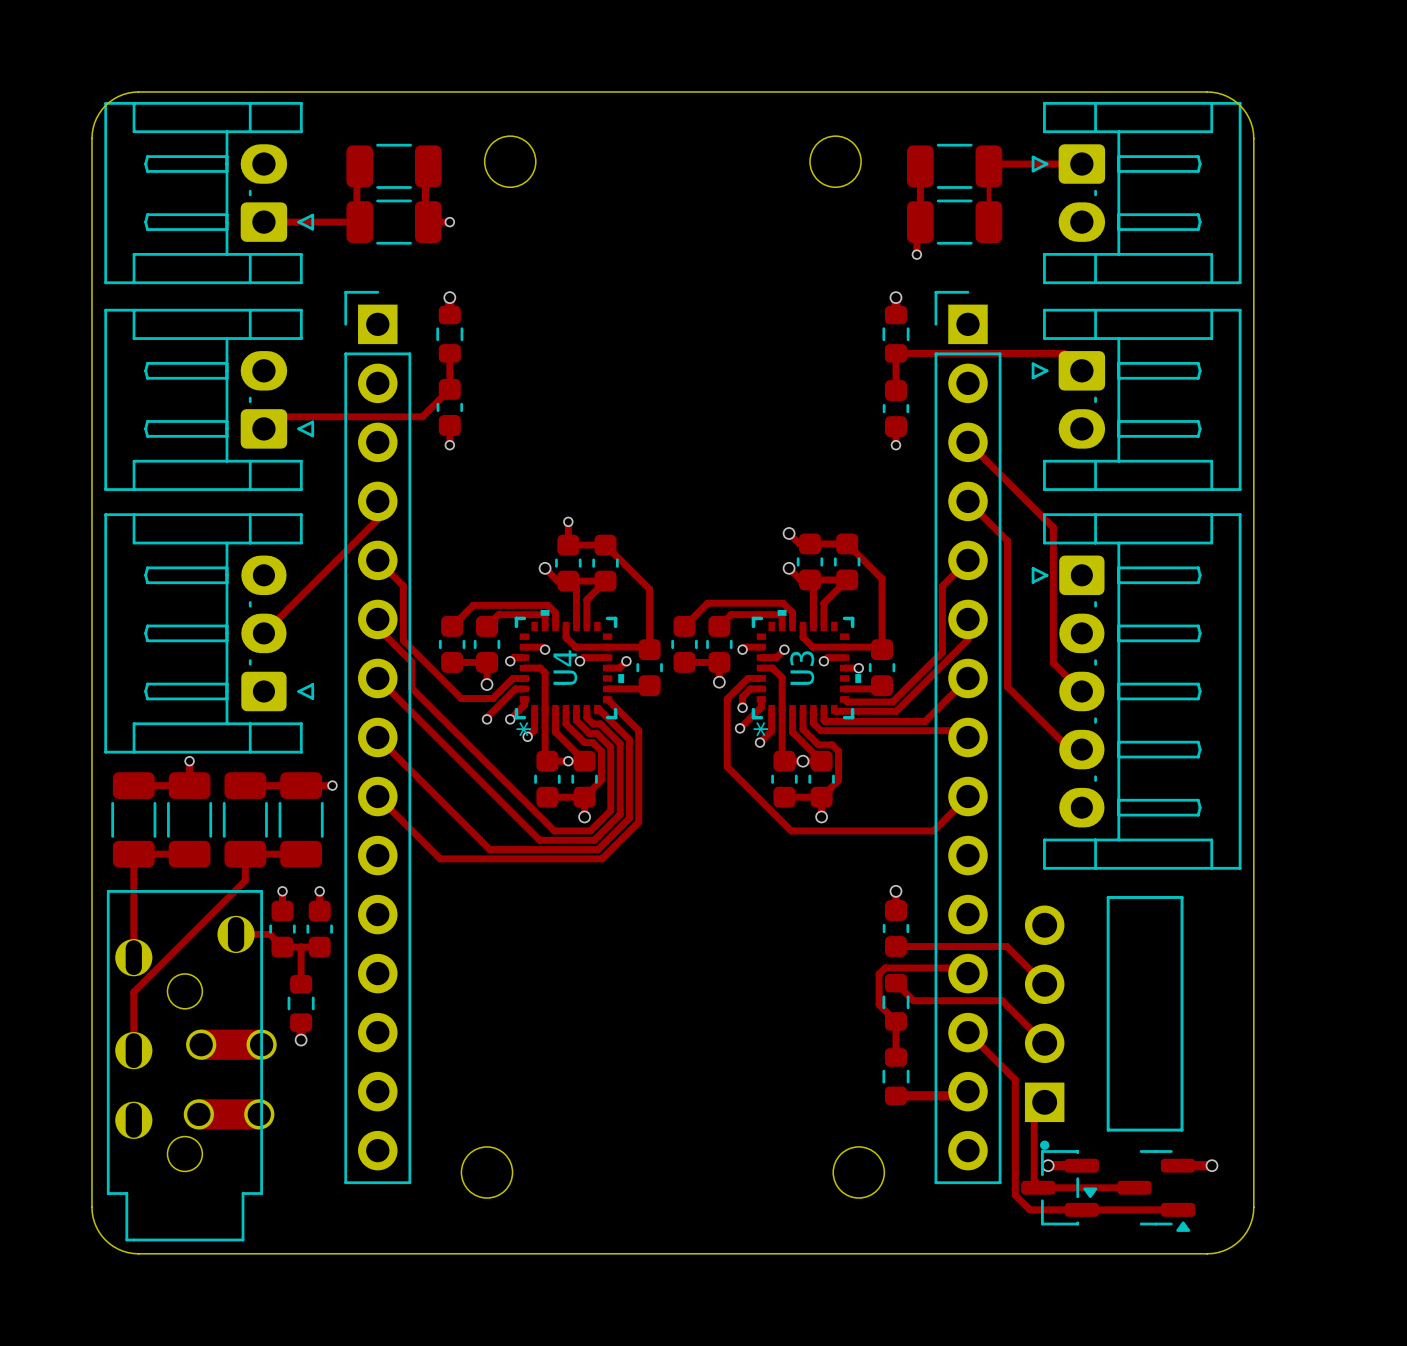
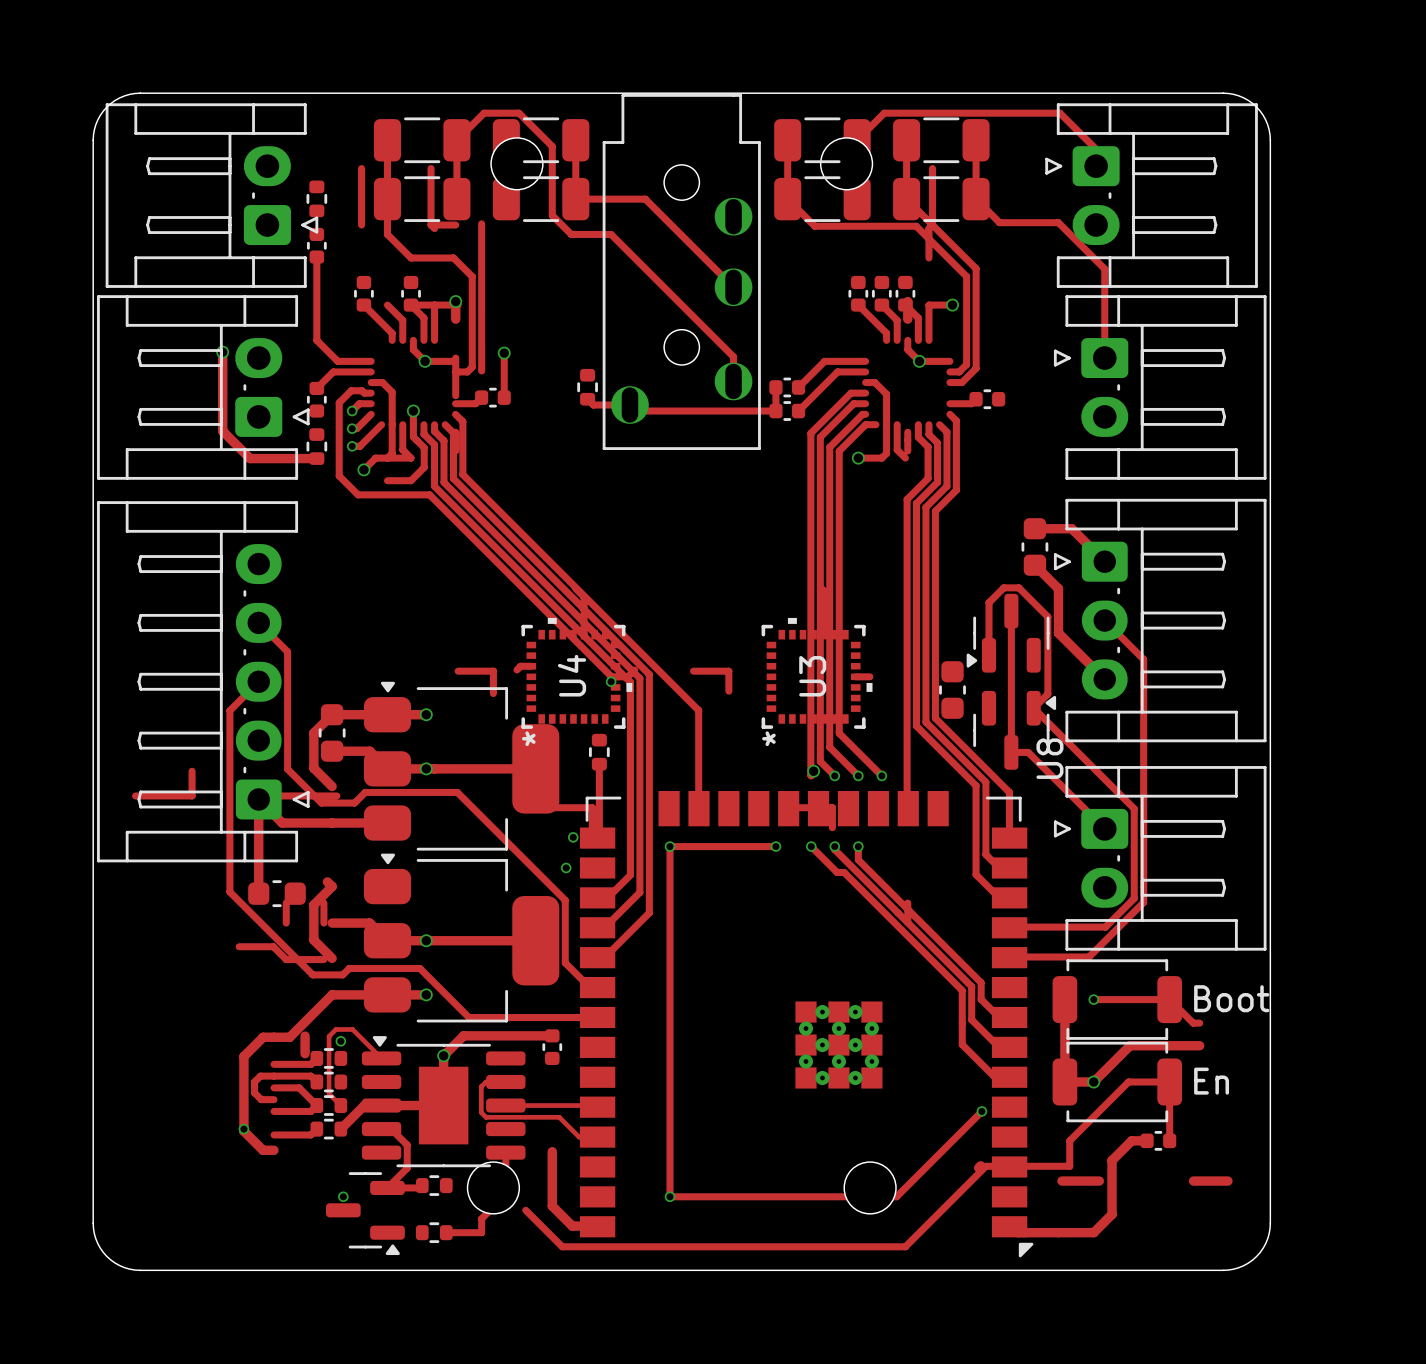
track: none -> (387, 140) (387, 234) (411, 257) (453, 257) (472, 276) (472, 367) (467, 371) (455, 371)
part: none -> (422, 140)
part: none -> (541, 140)
track: none -> (575, 140) (575, 199) (645, 199) (733, 287)
track: none -> (787, 140) (787, 199) (814, 226) (916, 226) (966, 276) (966, 364) (959, 371) (949, 371)
part: none -> (822, 140)
track: none -> (906, 140) (906, 199) (976, 268) (976, 368) (961, 382) (949, 382)
part: none -> (941, 140)
track: none -> (976, 140) (976, 199) (999, 222) (1058, 222) (1104, 269) (1104, 358)
track: none -> (1104, 157) (1060, 113) (884, 113) (857, 140) (857, 199)
track: (1081, 164) (991, 164) (988, 166) (988, 222) -> none
part: (394, 166) -> none
part: (954, 166) -> none
part: none -> (316, 198)
part: none -> (422, 199)
track: none -> (456, 199) (456, 140) (484, 113) (519, 113) (552, 146) (552, 215) (571, 234) (611, 234) (733, 356) (733, 381)
part: none -> (541, 199)
part: none -> (822, 199)
part: none -> (941, 199)
track: none -> (481, 223) (481, 370)
track: (359, 222) (273, 222) (263, 231) -> none
part: (394, 222) -> none
via: (449, 222) -> none
part: (954, 222) -> none
part: none -> (316, 245)
track: none -> (316, 257) (316, 340) (337, 361) (371, 361)
via: (916, 254) -> none
part: none -> (681, 272)
part: none -> (363, 293)
part: none -> (411, 293)
part: none -> (858, 293)
part: none -> (881, 293)
part: none -> (905, 293)
via: (895, 297) -> none
track: none -> (363, 305) (392, 333) (392, 340)
track: none -> (387, 305) (402, 320) (402, 340)
track: none -> (434, 305) (434, 340)
track: none -> (458, 305) (411, 305) (423, 318) (423, 340)
track: none -> (858, 305) (886, 333) (886, 340)
track: none -> (881, 305) (897, 320) (897, 340)
track: none -> (905, 305) (918, 318) (918, 340)
track: none -> (952, 305) (928, 305) (928, 340)
via: none -> (952, 305)
part: (449, 334) -> none
part: (895, 334) -> none
track: none -> (413, 340) (413, 349) (425, 361) (455, 361)
track: none -> (907, 340) (907, 349) (919, 361) (949, 361)
track: none -> (222, 352) (222, 431) (250, 458) (316, 458)
via: none -> (222, 352)
track: none -> (504, 353) (504, 397)
via: none -> (504, 353)
via: none -> (425, 361)
track: none -> (865, 361) (824, 361) (798, 387)
via: none -> (919, 361)
track: none -> (371, 371) (333, 371) (316, 388)
track: none -> (865, 371) (837, 371) (798, 411)
track: (1081, 370) (1064, 353) (895, 353) (895, 390) -> none
track: none -> (371, 382) (382, 382) (392, 392) (392, 453) (387, 458)
track: none -> (865, 382) (874, 382) (886, 394) (886, 453) (881, 458) (858, 458)
part: none -> (587, 387)
track: none -> (775, 387) (775, 411) (635, 411) (629, 405) (593, 405) (587, 399)
part: none -> (787, 387)
track: none -> (371, 393) (351, 390) (339, 402) (339, 475) (358, 494) (429, 494) (611, 676) (611, 681)
track: none -> (865, 393) (851, 393) (810, 433) (811, 775)
track: (449, 389) (422, 416) (276, 416) (263, 428) -> none
track: none -> (481, 397) (475, 403) (455, 403)
part: none -> (492, 397)
part: none -> (316, 399)
track: none -> (976, 399) (971, 403) (949, 403)
part: none -> (987, 399)
track: none -> (371, 403) (359, 403) (352, 411)
track: none -> (865, 403) (853, 403) (820, 437) (820, 761) (834, 775)
part position: (209, 399) -> (203, 387)
part position: (1136, 399) -> (1160, 387)
via: none -> (352, 411)
track: none -> (413, 411) (413, 436) (424, 447) (424, 467) (411, 480) (387, 480)
via: none -> (413, 411)
part: none -> (787, 411)
part: (449, 407) -> none
track: none -> (371, 414) (356, 428) (352, 428)
track: none -> (455, 414) (462, 421) (462, 474) (698, 710) (698, 808)
track: none -> (865, 414) (862, 414) (829, 447) (829, 747) (858, 775)
part: (895, 408) -> none
track: none -> (949, 414) (956, 420) (956, 490) (935, 511) (935, 718) (1009, 792) (1009, 838)
track: none -> (381, 424) (359, 446) (352, 446)
track: none -> (402, 424) (402, 449) (411, 458) (375, 458) (363, 469)
track: none -> (423, 424) (423, 434) (434, 444) (434, 486) (630, 682) (630, 875) (607, 897) (597, 897)
track: none -> (434, 424) (434, 431) (444, 440) (444, 482) (639, 678) (639, 892) (604, 927) (597, 927)
track: none -> (445, 424) (453, 432) (453, 478) (649, 674) (649, 912) (604, 957) (597, 957)
track: none -> (875, 424) (865, 424) (839, 451) (839, 733) (881, 775)
track: none -> (897, 424) (897, 449) (905, 458)
track: none -> (918, 424) (918, 437) (928, 446) (928, 478) (907, 499) (907, 805) (910, 807)
track: none -> (928, 424) (928, 434) (937, 443) (937, 482) (916, 503) (916, 726) (976, 785) (976, 874) (999, 897) (1009, 897)
track: none -> (939, 424) (946, 432) (946, 486) (925, 507) (925, 722) (985, 782) (985, 854) (999, 868) (1009, 868)
via: none -> (352, 428)
part: none -> (316, 446)
via: none -> (352, 446)
track: (968, 442) (1053, 527) (1053, 662) (1081, 691) -> none
via: (449, 445) -> none
via: (895, 445) -> none
via: none -> (858, 458)
via: none -> (363, 469)
track: (377, 501) (377, 519) (263, 633) -> none
track: (968, 501) (1007, 540) (1007, 686) (1070, 749) (1081, 749) -> none
track: (568, 521) (568, 545) (605, 545) (649, 589) (649, 649) (647, 647) (575, 647) (566, 637) (566, 626) -> none
via: (568, 521) -> none
track: none -> (1034, 528) (1071, 528) (1104, 561)
track: (789, 533) (799, 543) (847, 543) (882, 578) (882, 649) (879, 647) (812, 647) (803, 637) (803, 626) -> none
via: (789, 533) -> none
part: none -> (1034, 546)
track: none -> (1034, 565) (1058, 588) (1058, 633) (1104, 679)
track: (377, 560) (403, 586) (403, 640) (461, 698) (492, 698) (512, 678) (524, 678) -> none
track: (968, 560) (942, 586) (942, 652) (892, 701) (847, 701) (844, 699) -> none
part: (809, 561) -> none
part: (847, 561) -> none
part: (568, 563) -> none
part: (605, 563) -> none
track: (545, 568) (557, 581) (605, 581) (586, 599) (586, 626) -> none
via: (545, 568) -> none
track: (789, 568) (800, 579) (847, 579) (823, 603) (823, 626) -> none
via: (789, 568) -> none
track: none -> (1011, 611) (1011, 752) (1028, 752) (1104, 828)
track: none -> (1104, 620) (1143, 659) (1143, 902) (1089, 956) (1011, 956)
part: none -> (1160, 620)
track: none -> (258, 622) (287, 651) (287, 769) (321, 803) (354, 803) (365, 792) (457, 792) (565, 900) (565, 962) (589, 987) (597, 987)
track: (377, 619) (377, 628) (411, 661) (411, 688) (554, 830) (590, 830) (610, 810) (610, 747) (596, 733) (589, 733) (576, 720) (576, 709) -> none
track: (968, 619) (968, 639) (896, 711) (836, 711) (834, 709) -> none
part: none -> (1008, 633)
track: (452, 626) (473, 605) (548, 605) (555, 612) (555, 626) -> none
track: (487, 626) (498, 614) (544, 614) (545, 626) -> none
track: (684, 626) (707, 603) (782, 603) (792, 612) (792, 626) -> none
track: (719, 626) (731, 614) (781, 614) (782, 626) -> none
part: (209, 633) -> none
part: (452, 644) -> none
part: (487, 644) -> none
part: (684, 644) -> none
part: (719, 644) -> none
track: none -> (989, 655) (989, 602) (1003, 587) (1018, 587) (1047, 616) (1047, 694) (1033, 708) (1134, 808) (1134, 898) (1105, 927) (1011, 927)
track: (524, 647) (542, 647) (545, 649) -> none
track: (761, 647) (745, 647) (742, 649) -> none
via: (545, 649) -> none
via: (742, 649) -> none
track: (784, 649) (776, 657) (761, 657) -> none
via: (784, 649) -> none
track: (607, 657) (583, 657) (579, 661) -> none
track: (844, 657) (827, 657) (823, 661) -> none
via: (510, 661) -> none
via: (579, 661) -> none
via: (626, 661) -> none
via: (823, 661) -> none
part: (649, 667) -> none
part position: (882, 667) -> (952, 690)
track: (524, 668) (540, 668) (545, 672) (545, 758) (547, 761) (584, 761) (555, 732) (555, 709) -> none
track: (761, 668) (772, 668) (782, 677) (782, 758) (784, 761) (821, 761) (792, 732) (792, 709) -> none
via: (858, 668) -> none
part: none -> (203, 681)
track: none -> (258, 681) (229, 710) (229, 891) (312, 974) (342, 974) (349, 968) (419, 968) (468, 1017) (597, 1017)
via: none -> (611, 681)
track: (377, 678) (539, 840) (594, 840) (620, 814) (620, 743) (600, 723) (593, 723) (586, 717) (586, 709) -> none
track: (761, 678) (747, 678) (727, 698) (727, 766) (791, 830) (933, 830) (968, 796) -> none
track: (968, 678) (925, 721) (824, 721) (823, 709) -> none
via: (719, 682) -> none
via: (487, 684) -> none
track: (649, 685) (646, 688) (607, 688) -> none
track: (882, 685) (878, 688) (844, 688) -> none
track: (524, 688) (515, 688) (487, 719) -> none
track: (761, 688) (750, 688) (742, 696) (742, 707) -> none
part: (1136, 691) -> none
track: (524, 699) (524, 705) (510, 719) -> none
track: (607, 699) (638, 730) (638, 822) (601, 858) (440, 858) (377, 796) -> none
track: (761, 699) (761, 707) (740, 728) -> none
track: none -> (426, 714) (332, 714) (313, 732) (313, 768) (332, 786)
via: none -> (426, 714)
via: (742, 707) -> none
track: (534, 709) (534, 729) (527, 736) -> none
track: (566, 709) (566, 724) (584, 742) (592, 742) (601, 751) (601, 780) (584, 797) -> none
track: (597, 709) (629, 739) (629, 818) (598, 849) (489, 849) (377, 737) -> none
track: (771, 709) (771, 730) (760, 742) -> none
track: (803, 709) (803, 729) (818, 744) (832, 744) (838, 751) (838, 780) (821, 797) -> none
track: (813, 709) (813, 723) (820, 730) (961, 730) (968, 737) -> none
via: (487, 719) -> none
via: (510, 719) -> none
part: none -> (1014, 730)
part: none -> (332, 732)
via: (740, 728) -> none
via: (527, 736) -> none
part: (377, 737) -> none
part: (968, 737) -> none
track: none -> (332, 751) (369, 751) (387, 768) (535, 768)
part: none -> (599, 752)
via: (760, 742) -> none
track: none -> (599, 764) (599, 836) (597, 838)
part: none -> (461, 766)
via: none -> (426, 768)
via: (189, 761) -> none
via: (568, 761) -> none
via: none -> (834, 775)
via: none -> (858, 775)
via: none -> (881, 775)
part: (547, 779) -> none
part: (584, 779) -> none
part: (784, 779) -> none
part: (821, 779) -> none
via: (332, 785) -> none
track: none -> (387, 823) (282, 823) (258, 799) (258, 893)
via: (584, 816) -> none
via: (821, 816) -> none
part: (133, 819) -> none
part: (189, 819) -> none
part: (245, 819) -> none
part: (301, 819) -> none
via: none -> (573, 837)
via: none -> (669, 846)
track: none -> (775, 846) (669, 846) (669, 1196) (896, 1196) (981, 1111)
via: none -> (775, 846)
track: none -> (811, 846) (837, 872) (844, 872) (962, 990) (962, 1044) (994, 1077) (1009, 1077)
via: none -> (811, 846)
track: none -> (834, 846) (834, 849) (971, 986) (971, 1019) (999, 1047) (1009, 1047)
via: none -> (834, 846)
track: none -> (858, 846) (858, 859) (981, 982) (981, 999) (999, 1017) (1009, 1017)
via: none -> (858, 846)
part: none -> (1160, 858)
track: (189, 854) (133, 854) (133, 957) -> none
track: (301, 854) (245, 854) (245, 880) (133, 992) (133, 1050) -> none
via: none -> (566, 867)
track: none -> (327, 881) (332, 886) (313, 904) (313, 940) (332, 958)
part: none -> (277, 893)
via: (282, 891) -> none
via: (319, 891) -> none
via: (895, 891) -> none
track: none -> (332, 923) (369, 923) (387, 940) (535, 940)
part: none -> (461, 938)
via: none -> (426, 940)
part: (895, 928) -> none
part: (282, 929) -> none
part: (319, 929) -> none
track: (895, 946) (1006, 946) (1044, 984) -> none
track: (301, 947) (301, 984) -> none
track: (968, 973) (962, 967) (885, 967) (879, 973) (879, 1004) (895, 1021) (895, 1057) -> none
track: none -> (426, 994) (332, 994) (289, 1037) (263, 1037) (243, 1056) (243, 1131) (262, 1150) (274, 1150)
via: none -> (426, 994)
track: (895, 983) (913, 1000) (1002, 1000) (1044, 1043) -> none
text: none -> Boot (1231, 998)
track: none -> (1064, 999) (1064, 1082) (1093, 1082) (1130, 1045) (1199, 1045)
track: none -> (1093, 999) (1169, 999) (1193, 1023) (1199, 1023)
via: none -> (1093, 999)
part: none -> (1117, 999)
part: (895, 1002) -> none
part: (301, 1003) -> none
U8: none -> (806, 1024)
track: none -> (552, 1035) (463, 1035) (443, 1055) (443, 1105) (364, 1105) (340, 1129)
part: (1104, 1022) -> none
via: none -> (340, 1041)
track: (968, 1032) (1015, 1079) (1015, 1195) (1029, 1209) (1178, 1209) -> none
part: none -> (552, 1047)
via: (301, 1040) -> none
via: none -> (443, 1055)
part: (231, 1044) -> none
track: none -> (316, 1058) (310, 1064) (274, 1064)
part: none -> (328, 1058)
track: none -> (381, 1058) (352, 1029) (335, 1029) (329, 1036) (329, 1093) (340, 1105)
part: (184, 1065) -> none
track: none -> (316, 1082) (310, 1076) (260, 1076) (254, 1082) (254, 1092) (261, 1099) (274, 1099)
part: none -> (328, 1082)
track: none -> (505, 1082) (486, 1082) (481, 1086) (481, 1112) (486, 1117) (559, 1117) (579, 1137) (597, 1137)
via: none -> (1093, 1082)
part: none -> (1117, 1082)
text: none -> En (1211, 1081)
track: none -> (274, 1087) (299, 1087) (316, 1105) (310, 1111) (274, 1111)
part: (895, 1076) -> none
part: none -> (443, 1101)
part: none -> (328, 1105)
track: none -> (505, 1105) (595, 1105) (597, 1107)
track: (968, 1091) (963, 1095) (895, 1095) -> none
via: none -> (981, 1111)
track: (1044, 1102) (1034, 1112) (1034, 1180) (1041, 1187) (1134, 1187) -> none
part: (229, 1114) -> none
via: none -> (243, 1129)
track: none -> (316, 1129) (310, 1134) (274, 1134)
part: none -> (328, 1129)
track: none -> (381, 1129) (391, 1129) (407, 1145) (407, 1168) (387, 1187) (419, 1187) (422, 1185)
track: none -> (1147, 1140) (1131, 1140) (1112, 1160) (1112, 1214) (1093, 1232) (1017, 1232) (1011, 1226) (1015, 1222)
part: none -> (1158, 1140)
track: none -> (1169, 1140) (1169, 1082) (1128, 1082) (1069, 1140) (1069, 1166) (985, 1166) (905, 1246) (562, 1246) (525, 1210)
track: none -> (552, 1151) (552, 1206) (572, 1226) (599, 1226)
track: none -> (505, 1152) (505, 1194) (481, 1218) (481, 1232) (446, 1232)
via: (1048, 1165) -> none
via: (1211, 1165) -> none
part: none -> (434, 1185)
via: none -> (343, 1196)
via: none -> (669, 1196)
part: (1060, 1187) -> none
part: (1156, 1191) -> none
part: none -> (365, 1213)
part: none -> (434, 1232)

